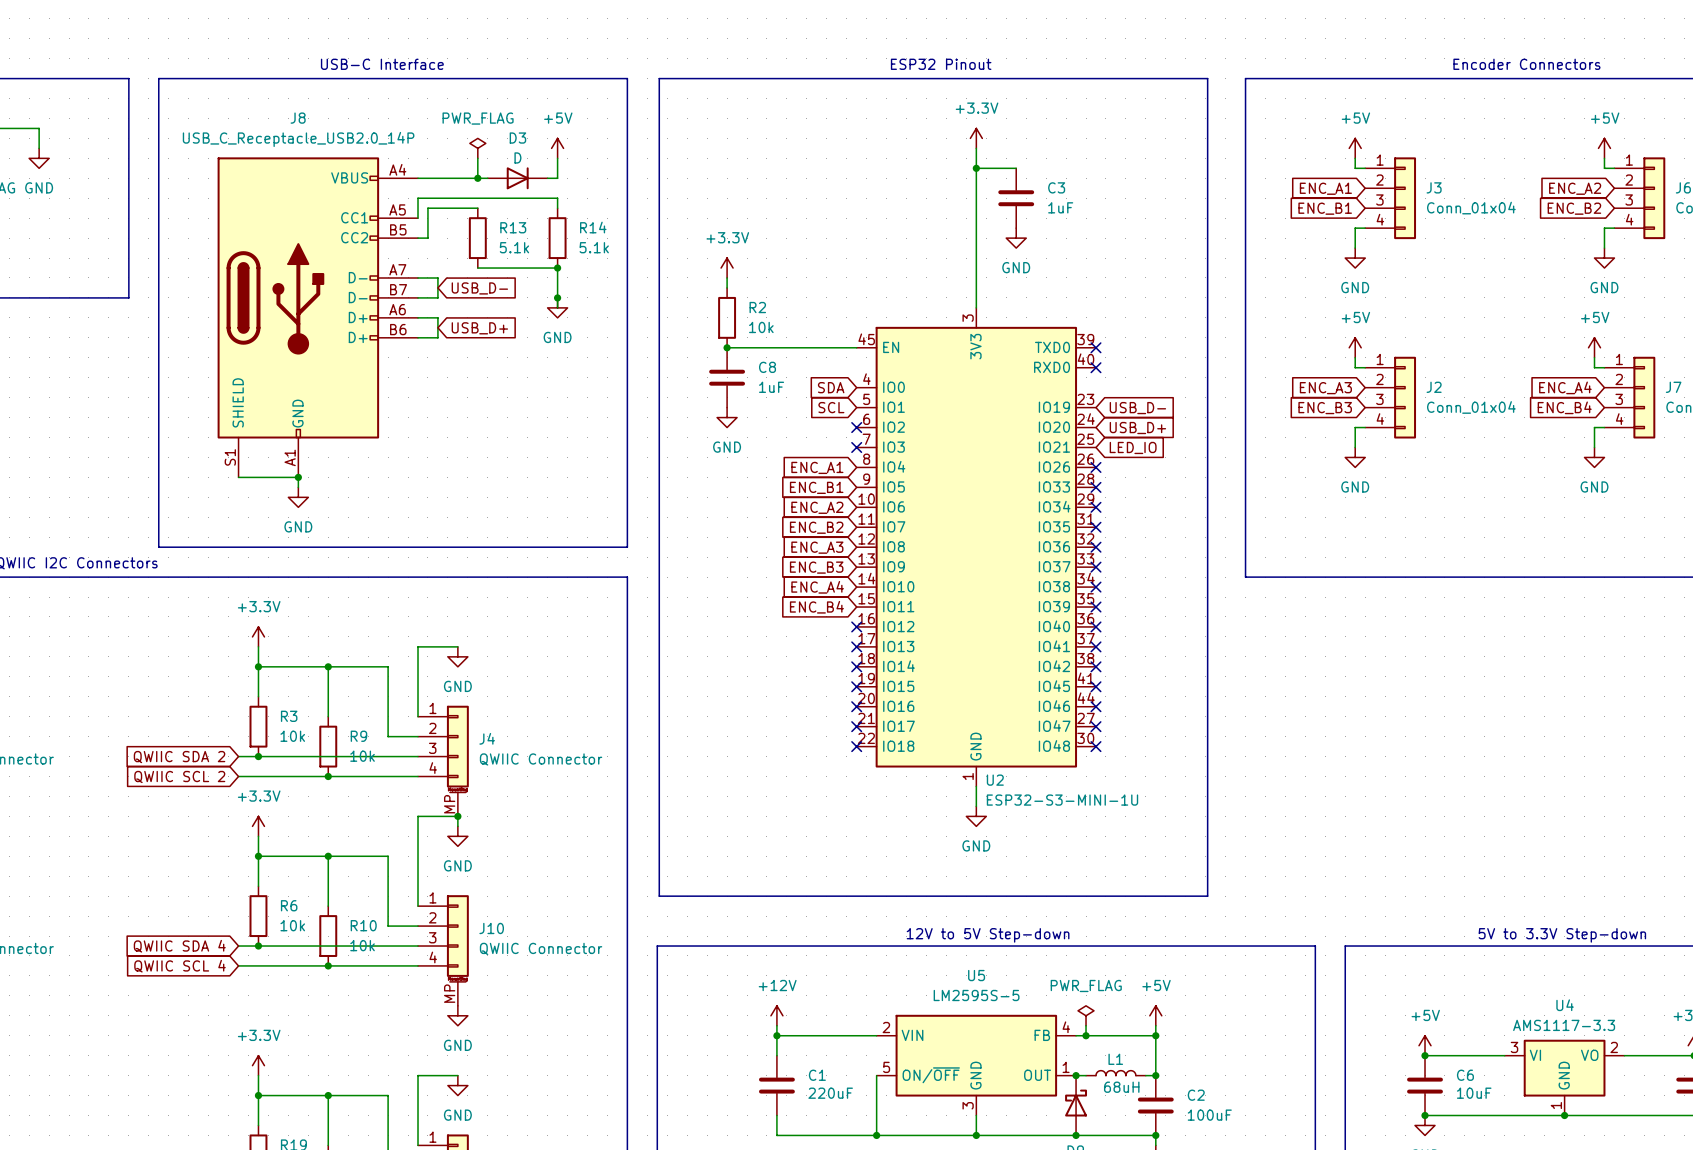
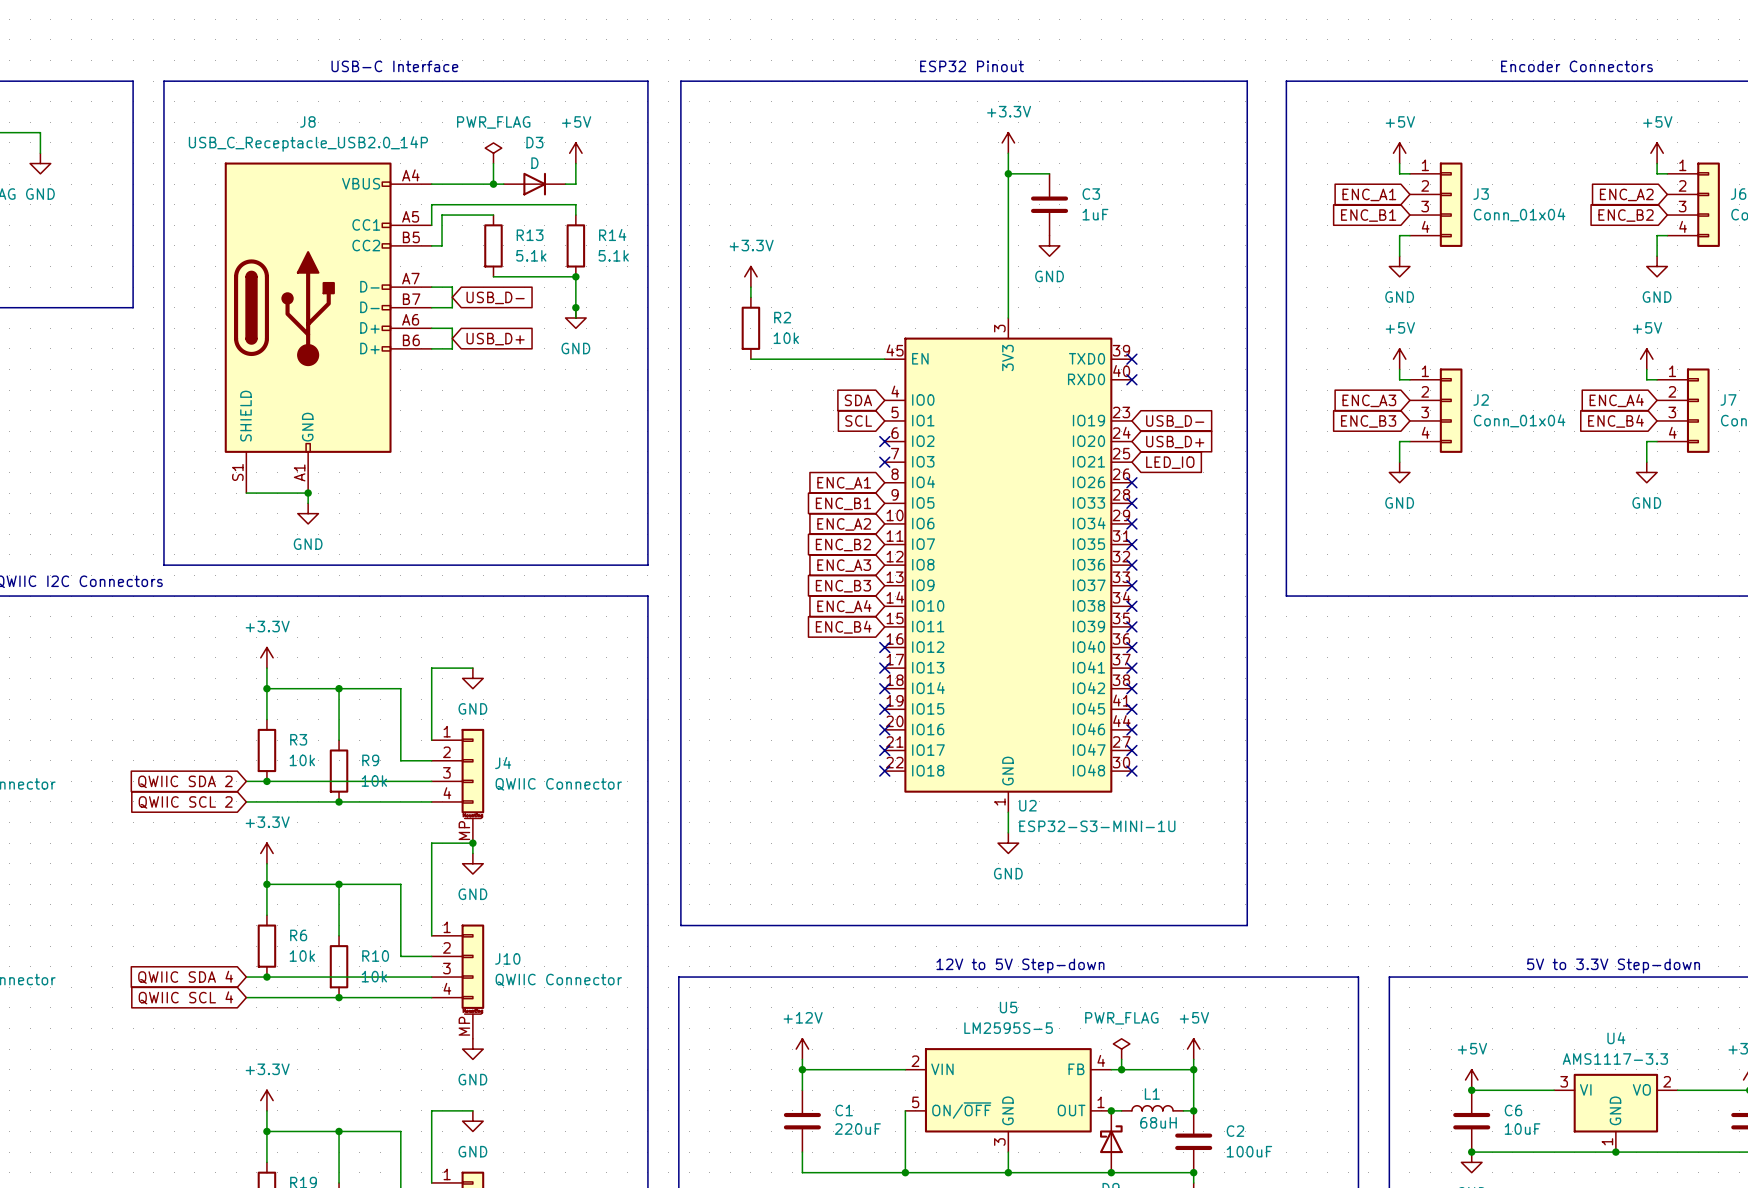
junction: (727, 347) -> none
C8: 1uF (727, 377) -> none
power symbol: GND (727, 417) -> none

